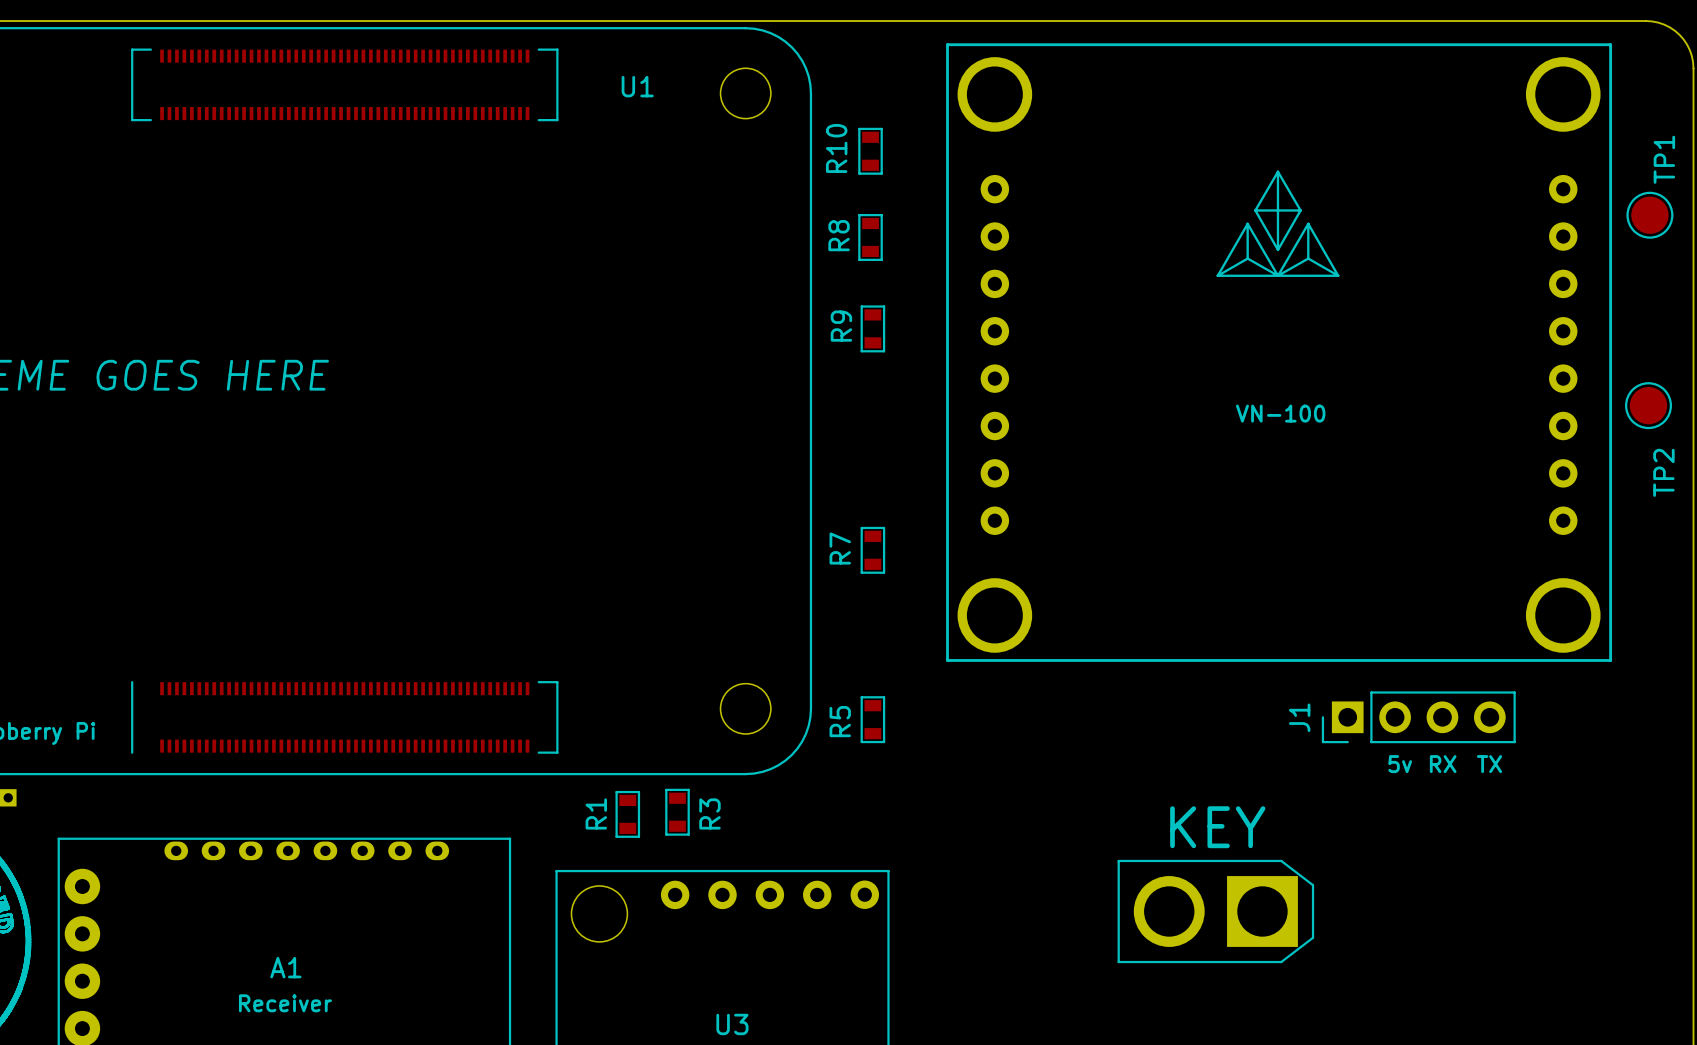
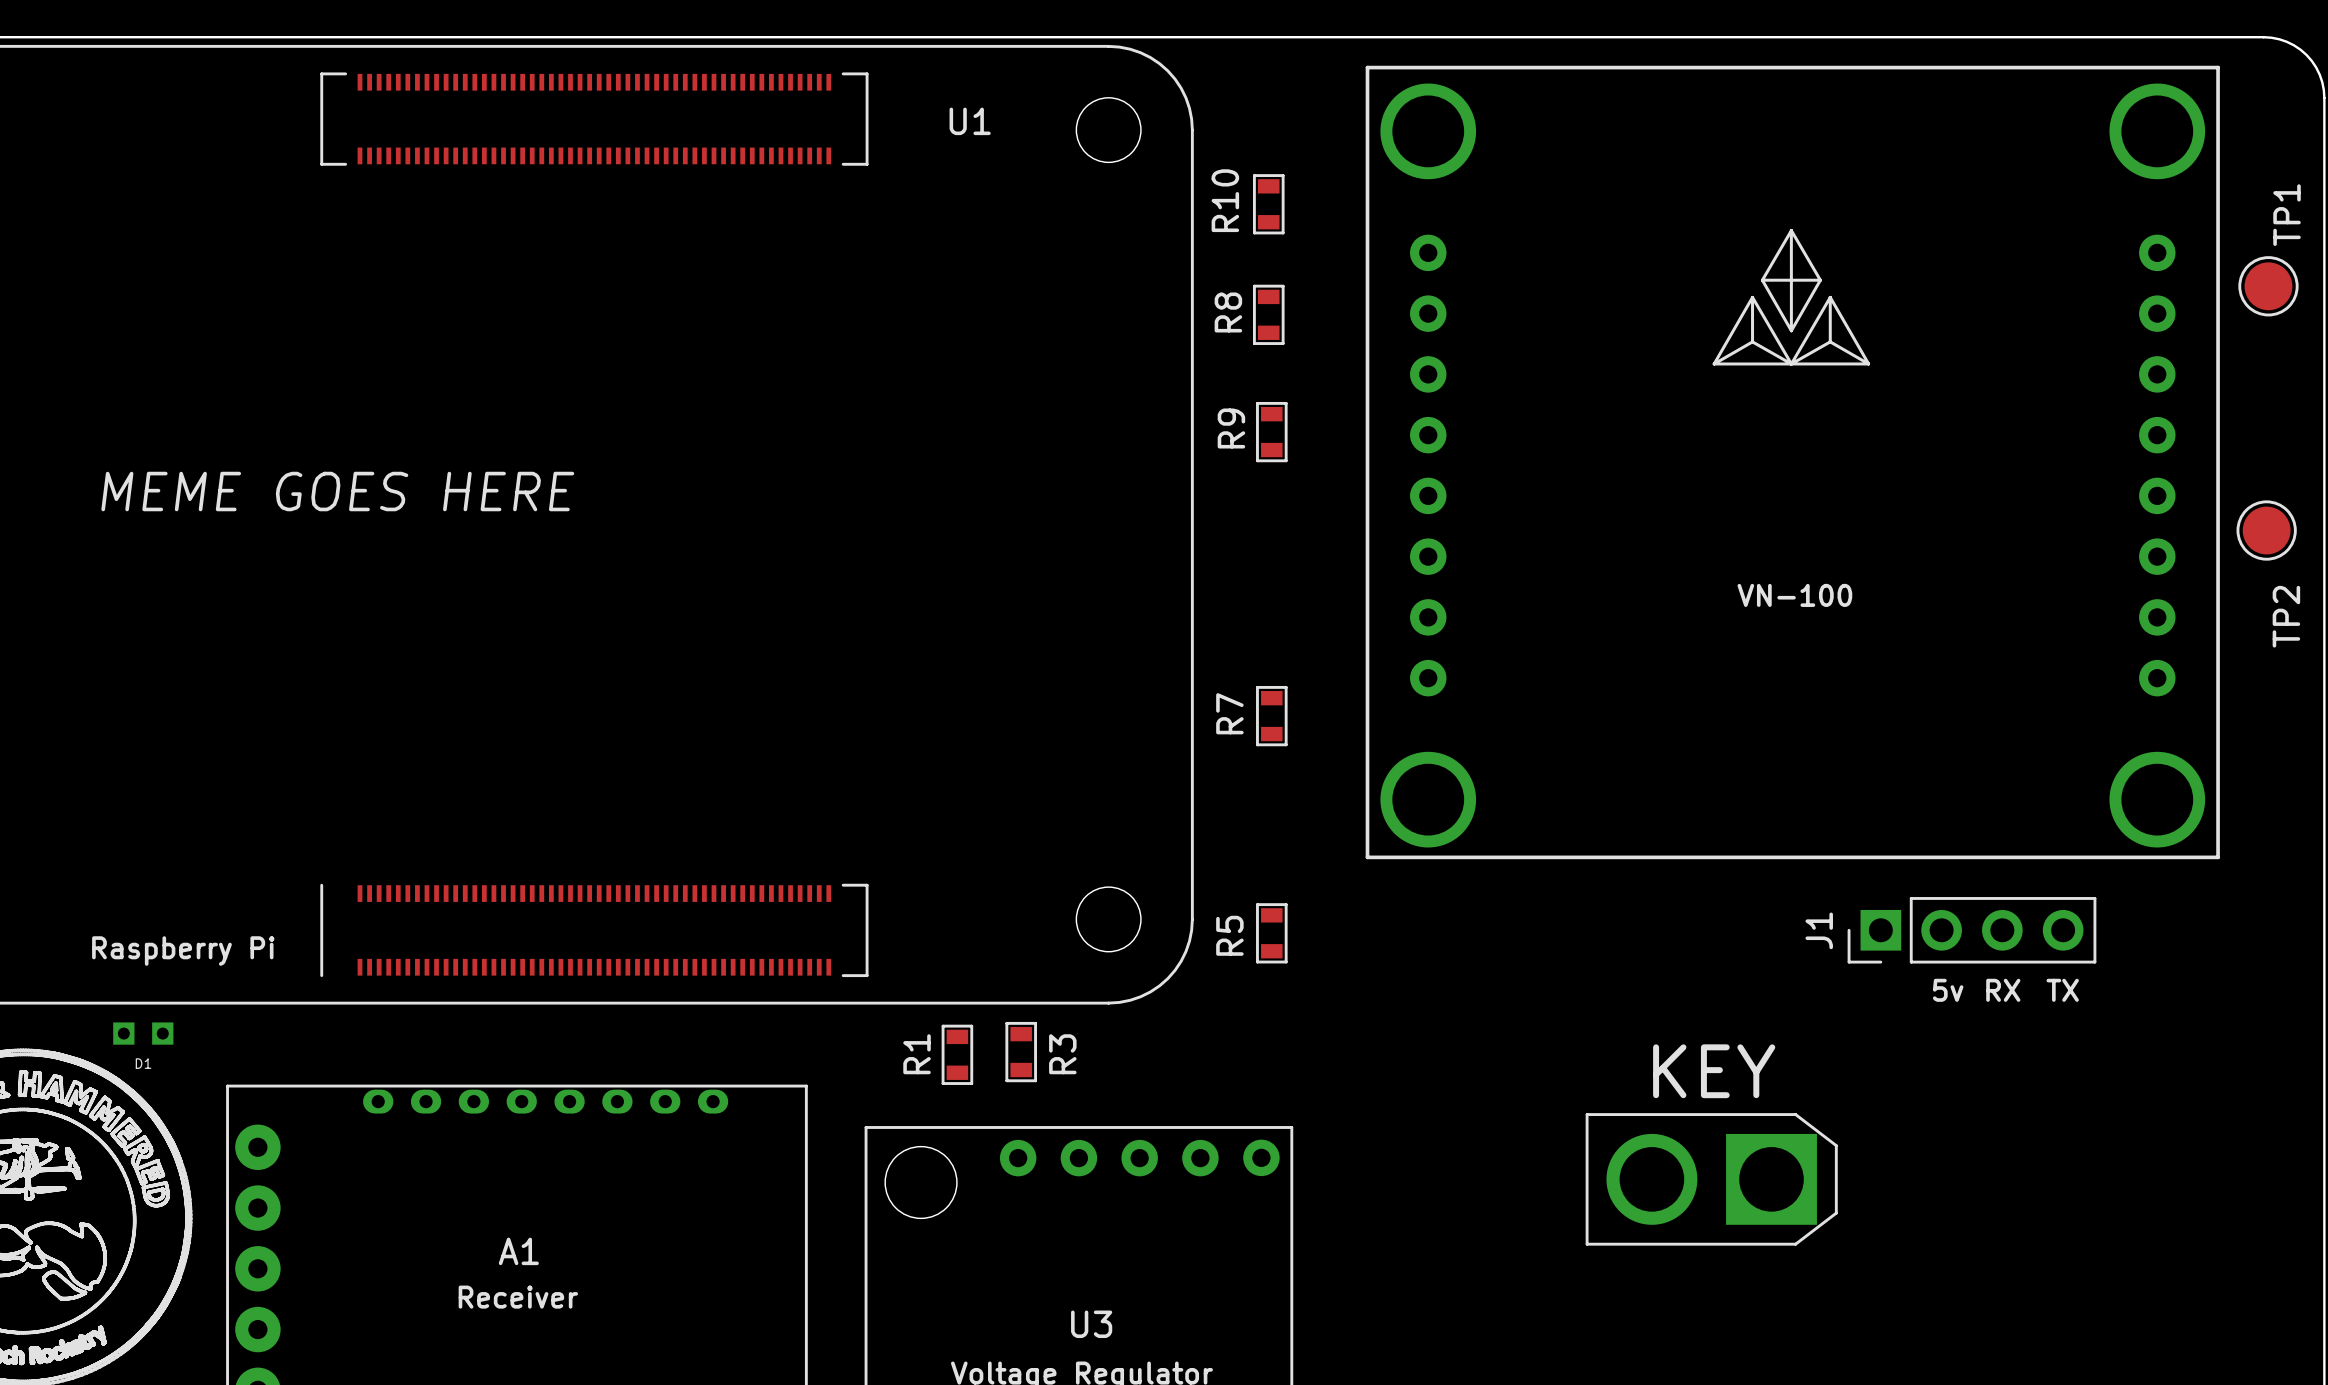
text position: VN-100 (1280, 413) -> VN-100 (1794, 595)

